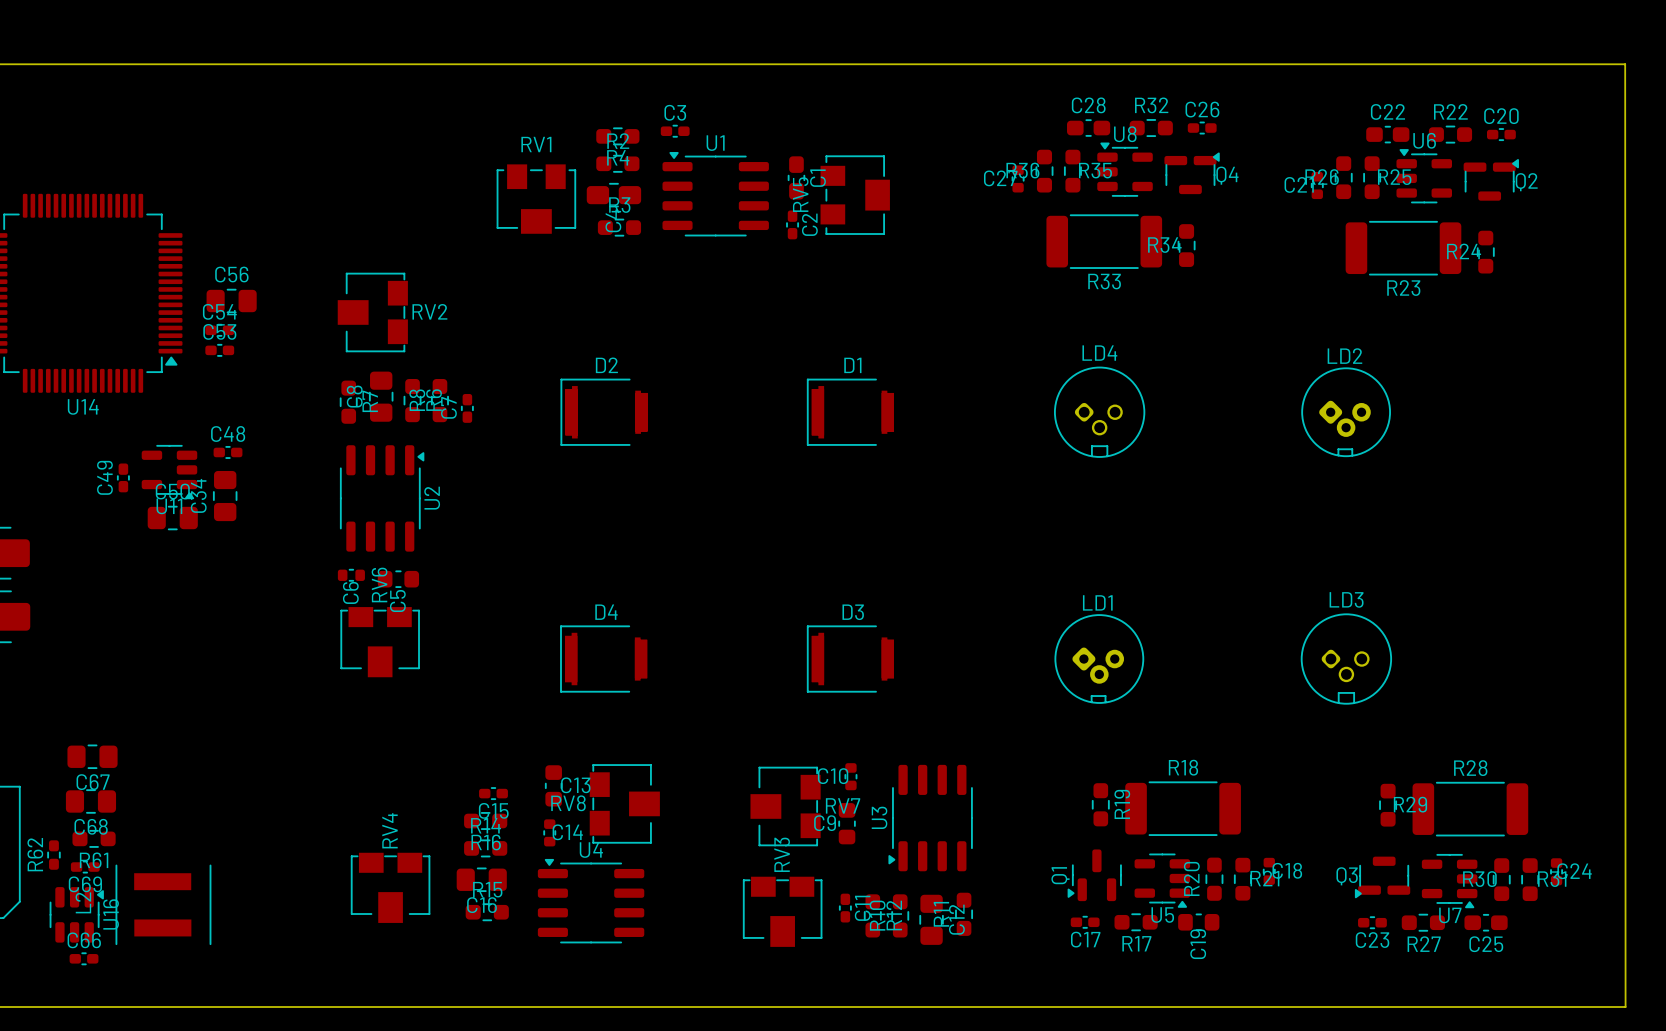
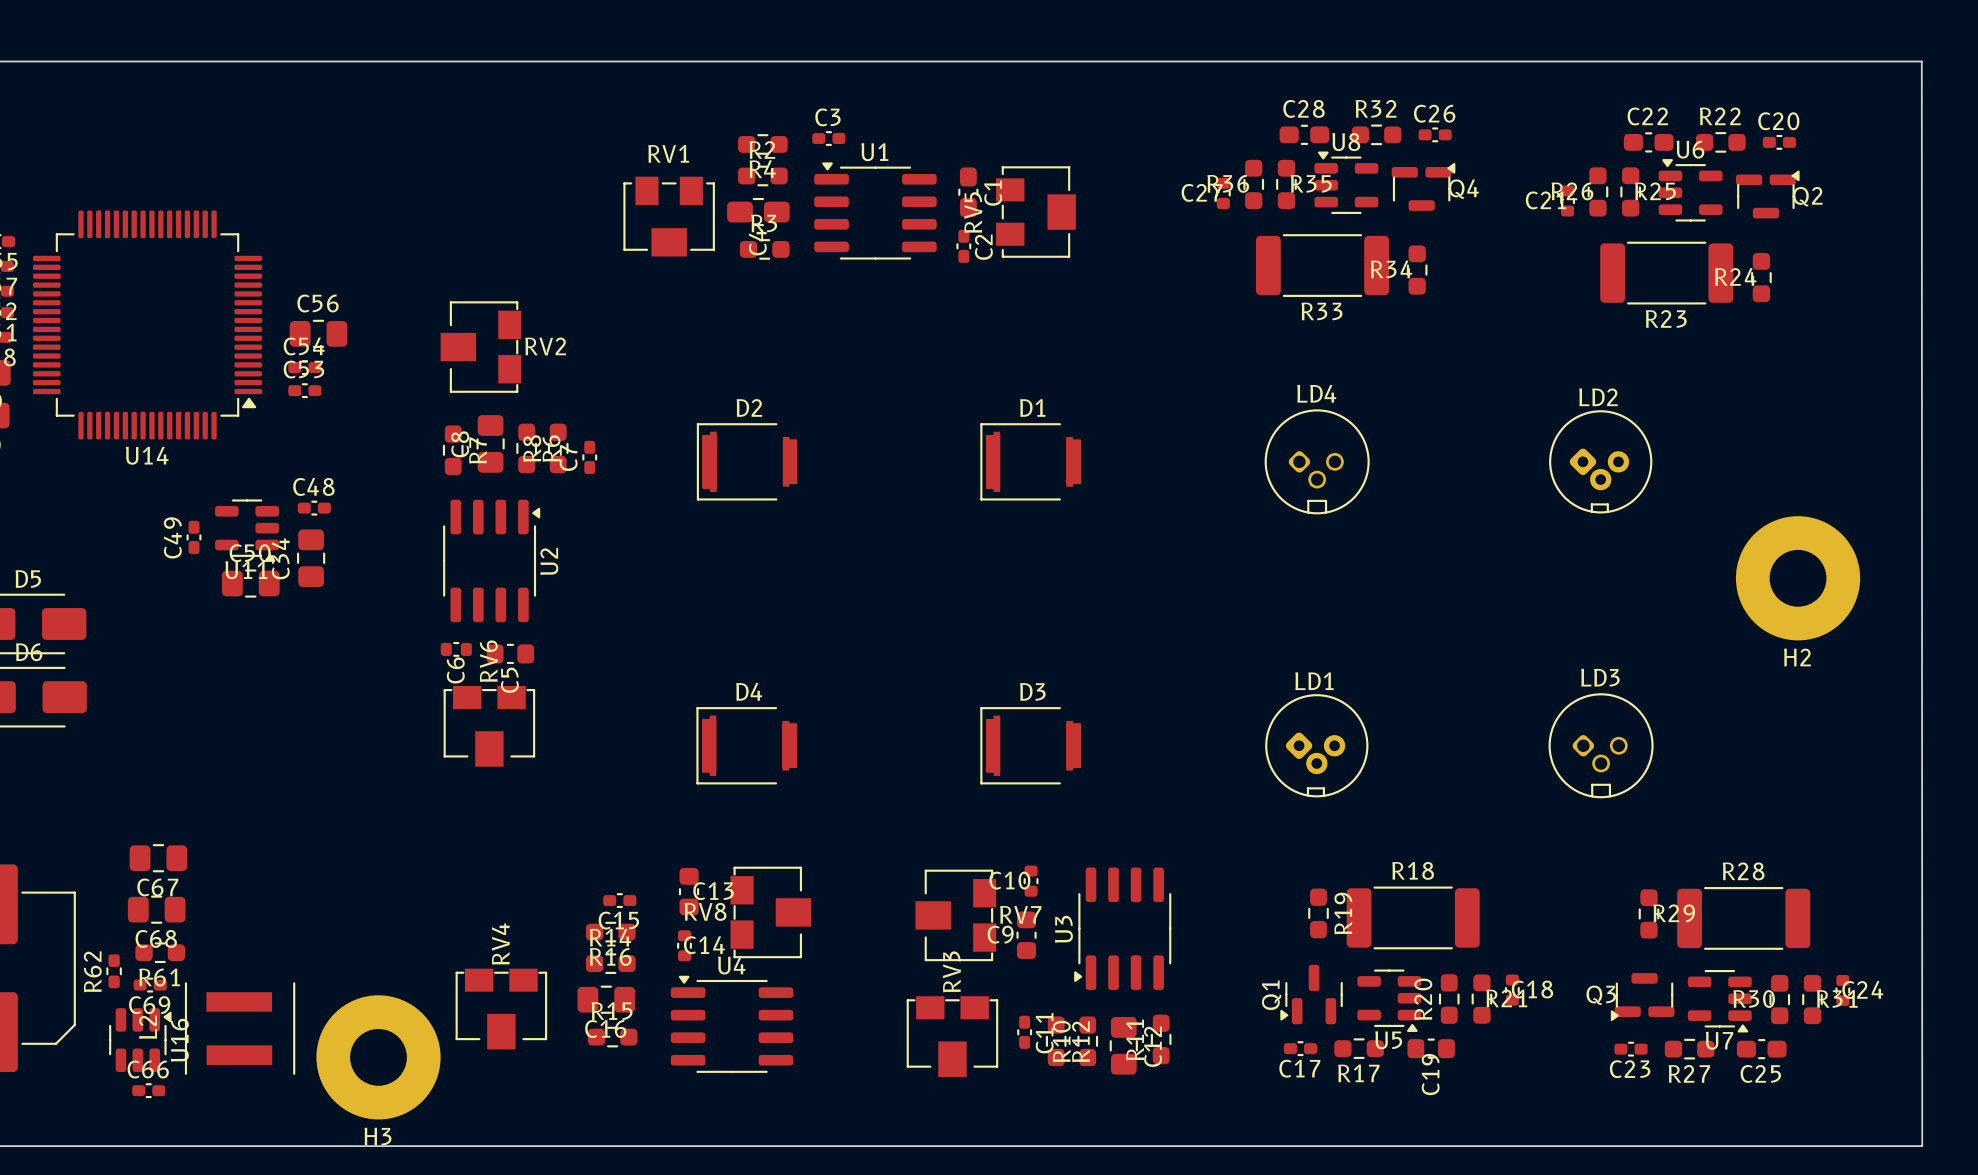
H2: none -> (1798, 578)
H3: none -> (378, 1057)

